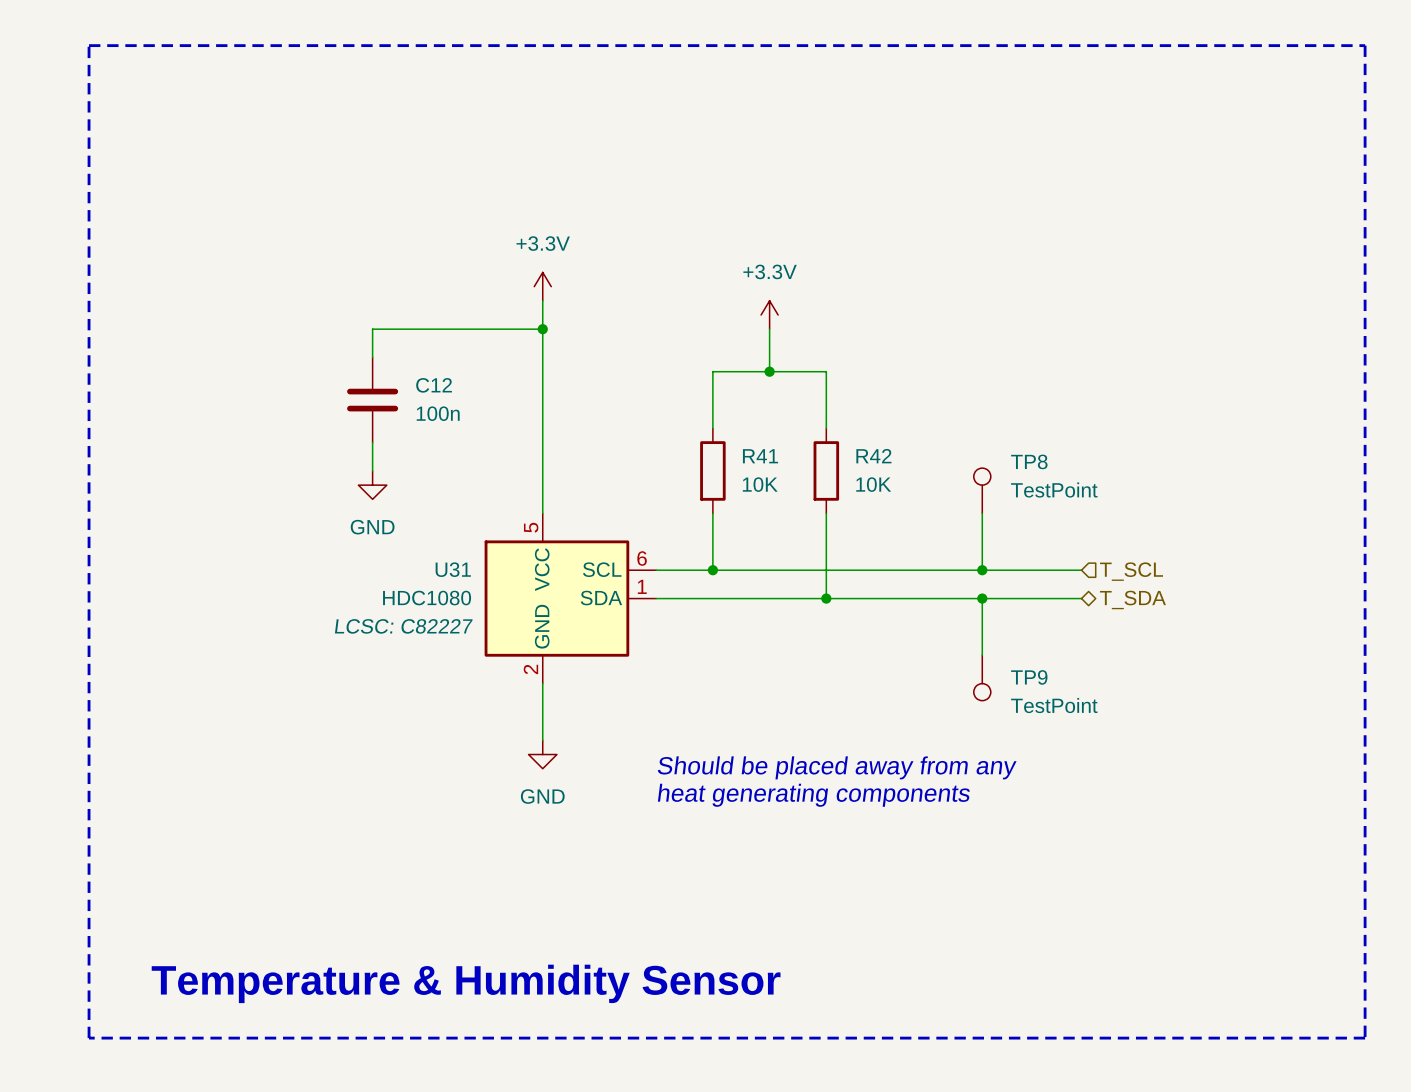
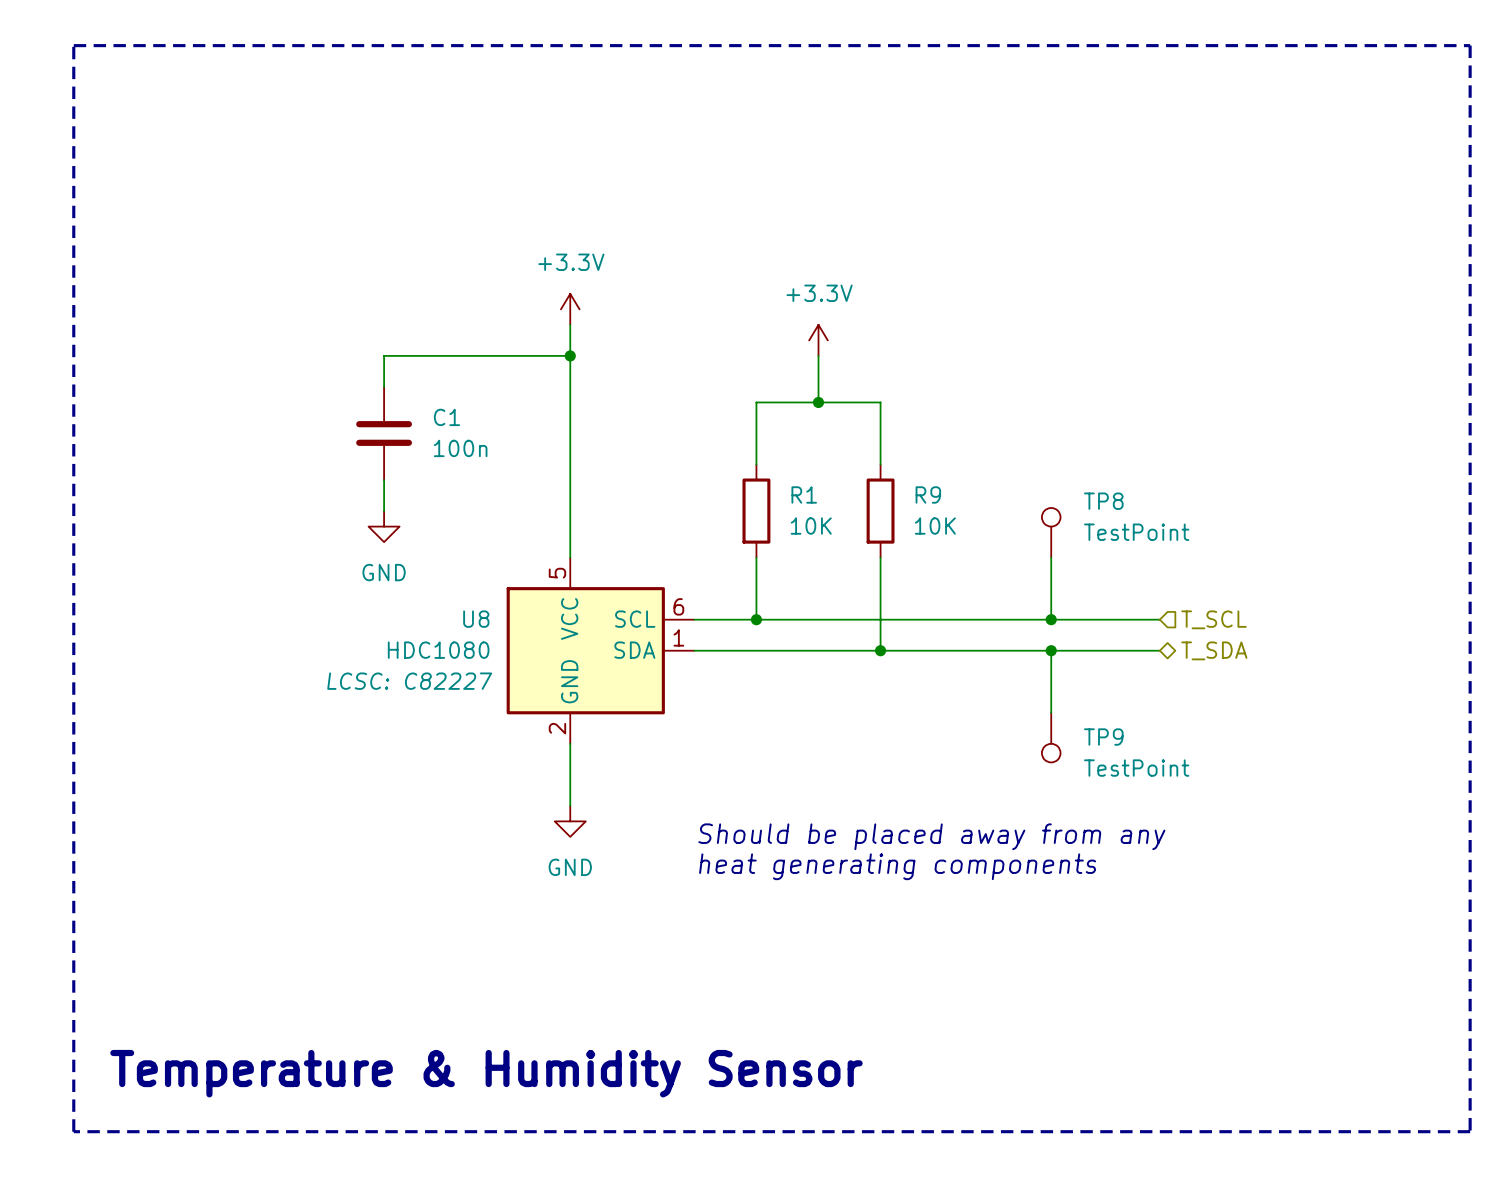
C12 name: C12 (434, 385) -> C1 (446, 417)
R41 name: R41 (760, 456) -> R1 (804, 494)
R42 name: R42 (873, 456) -> R9 (928, 494)
U31 name: U31 (453, 569) -> U8 (476, 619)

